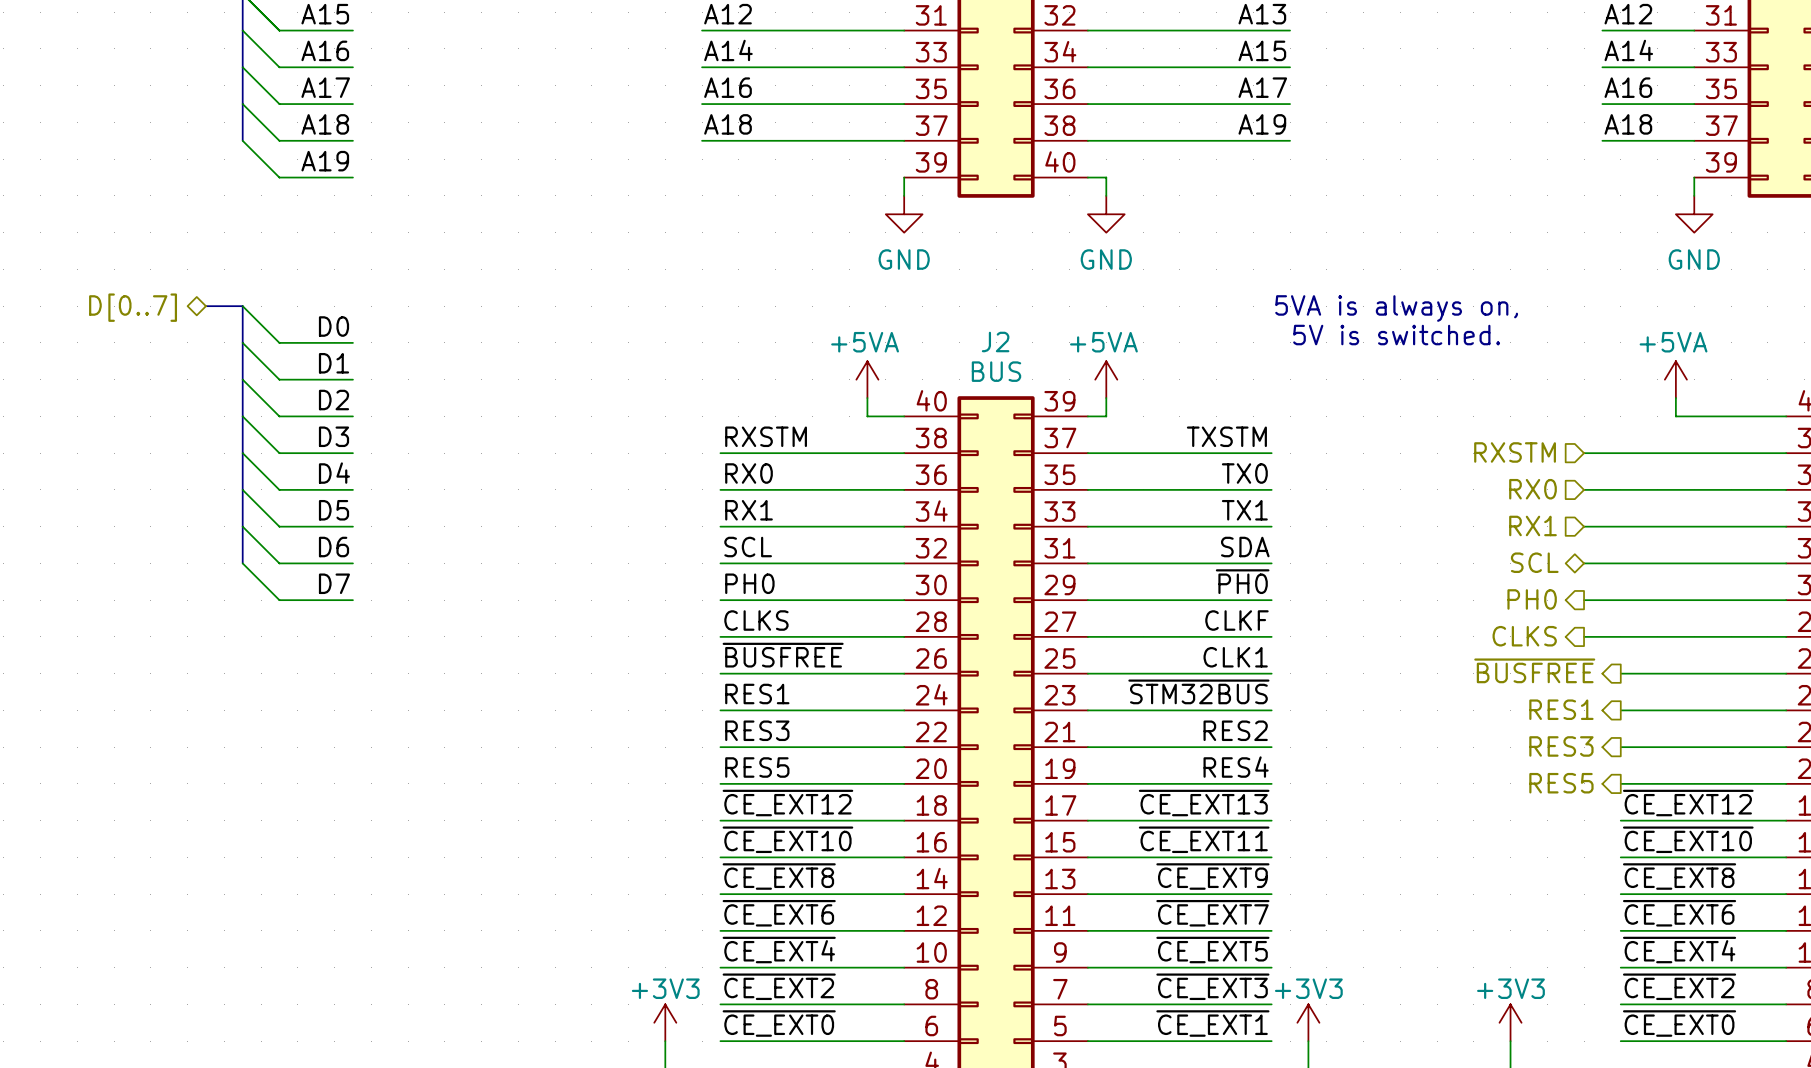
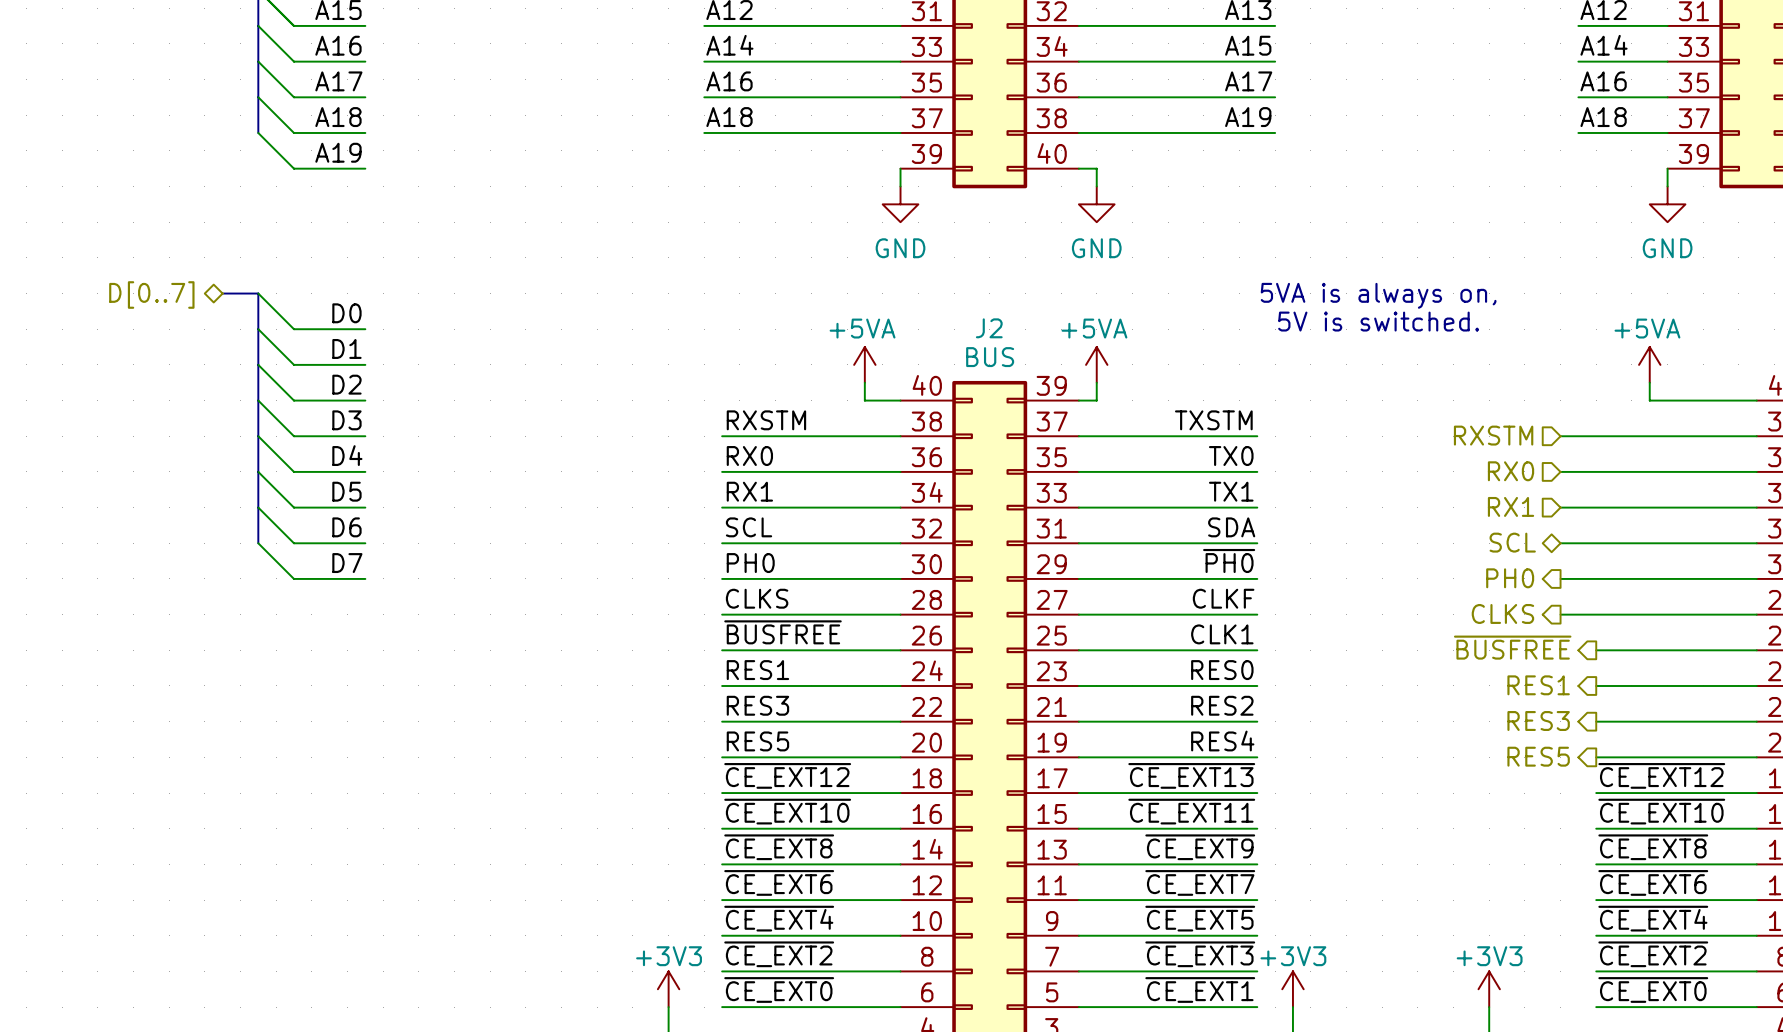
label: ~{STM32BUS} (1198, 691) -> RES0 (1222, 670)

